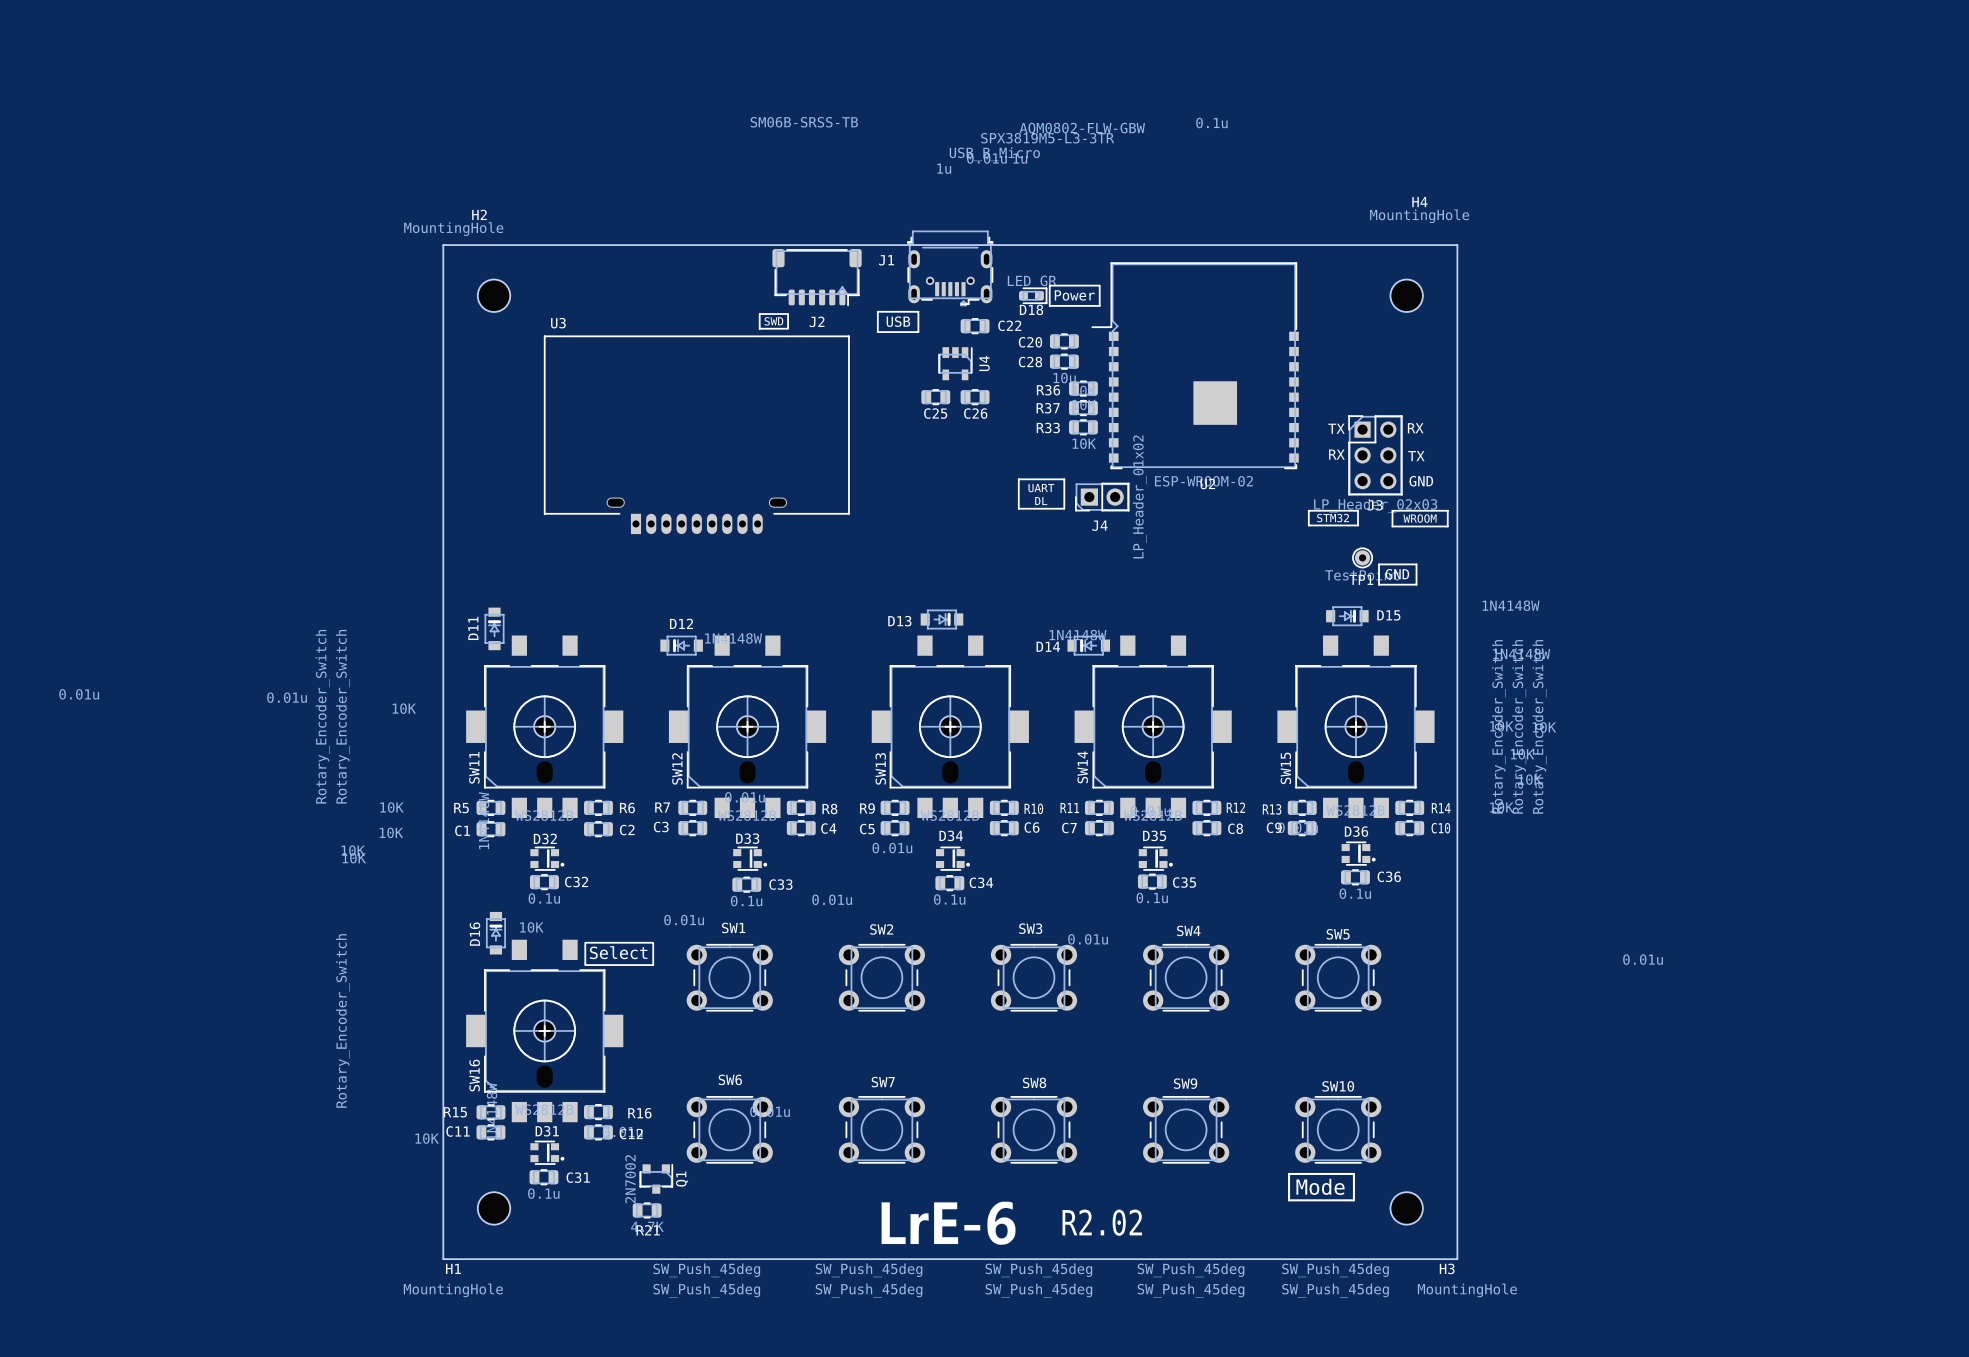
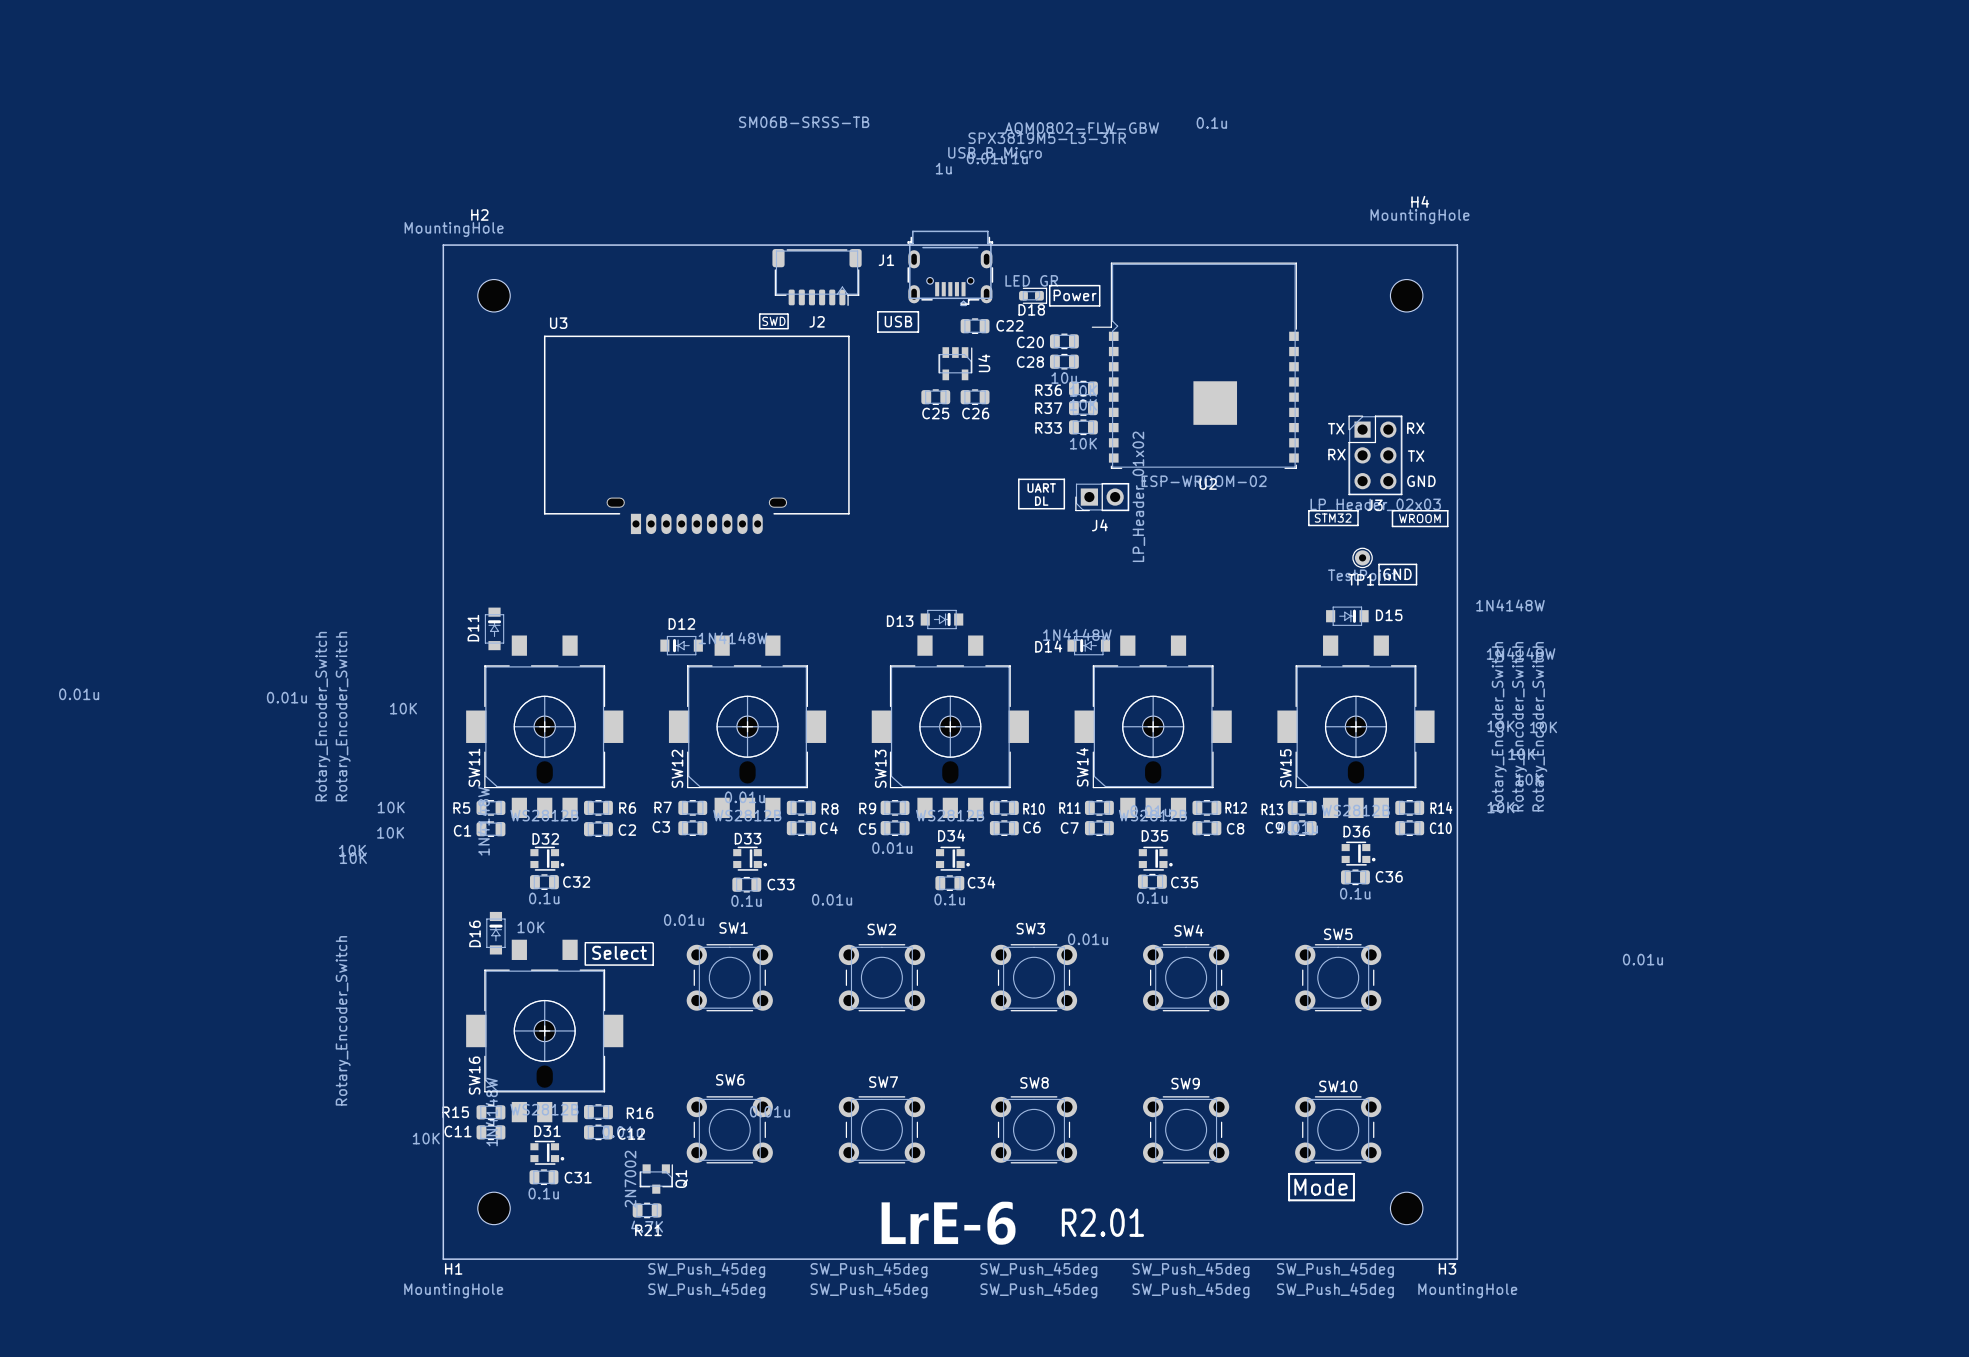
text: R2.02 (1102, 1222) -> R2.01 (1102, 1222)

